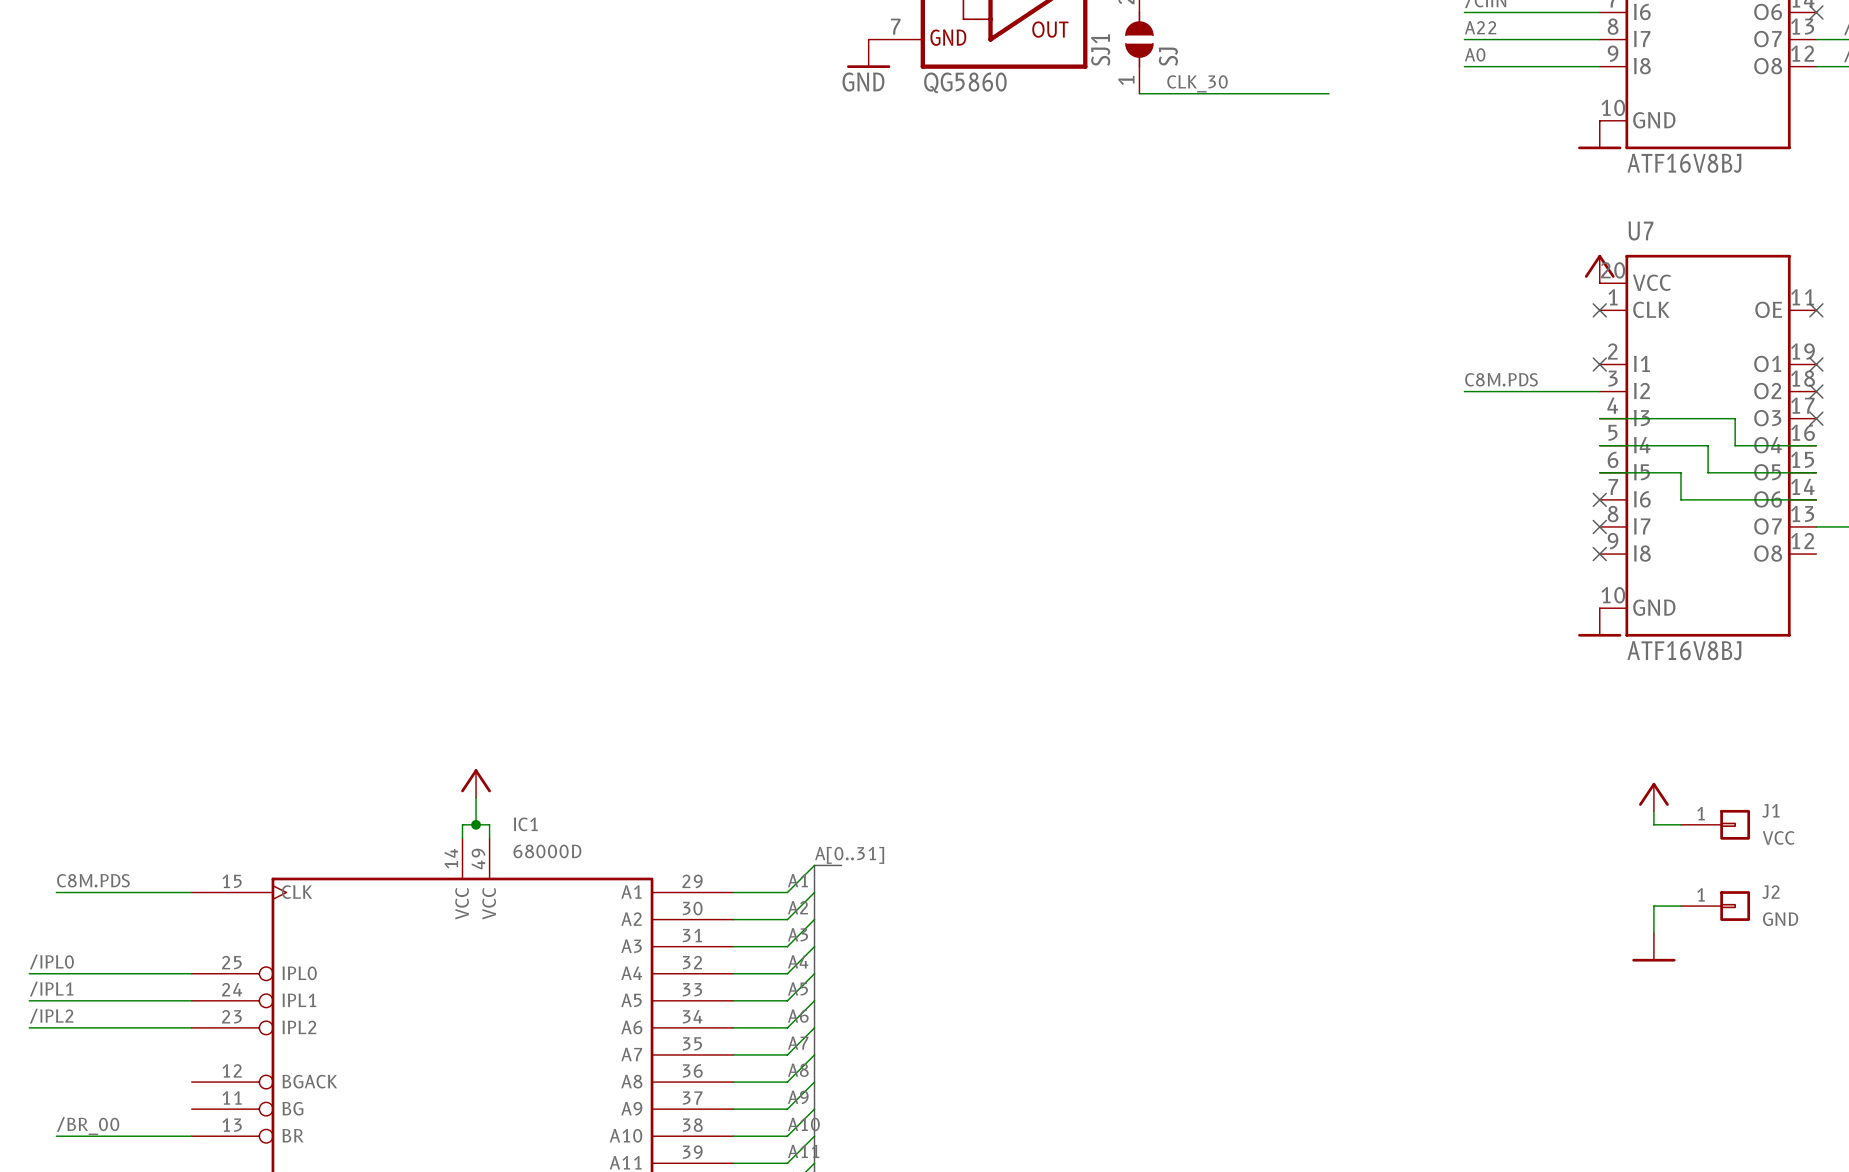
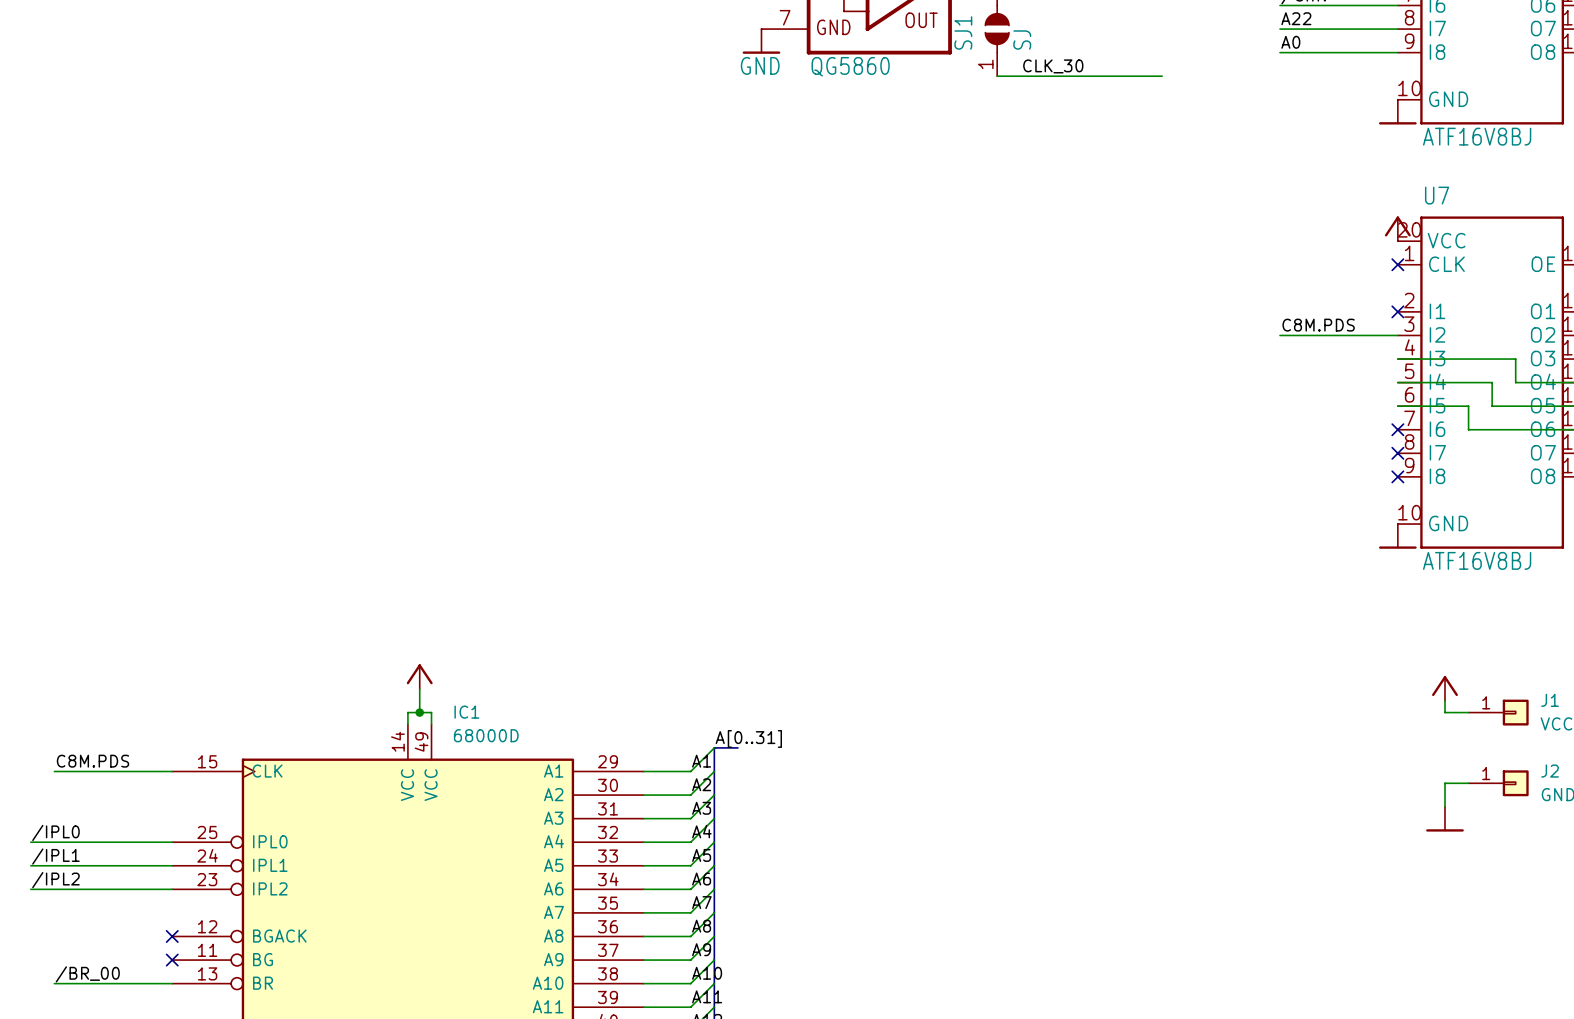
no-connect mark: none -> (172, 936)
no-connect mark: none -> (172, 960)

